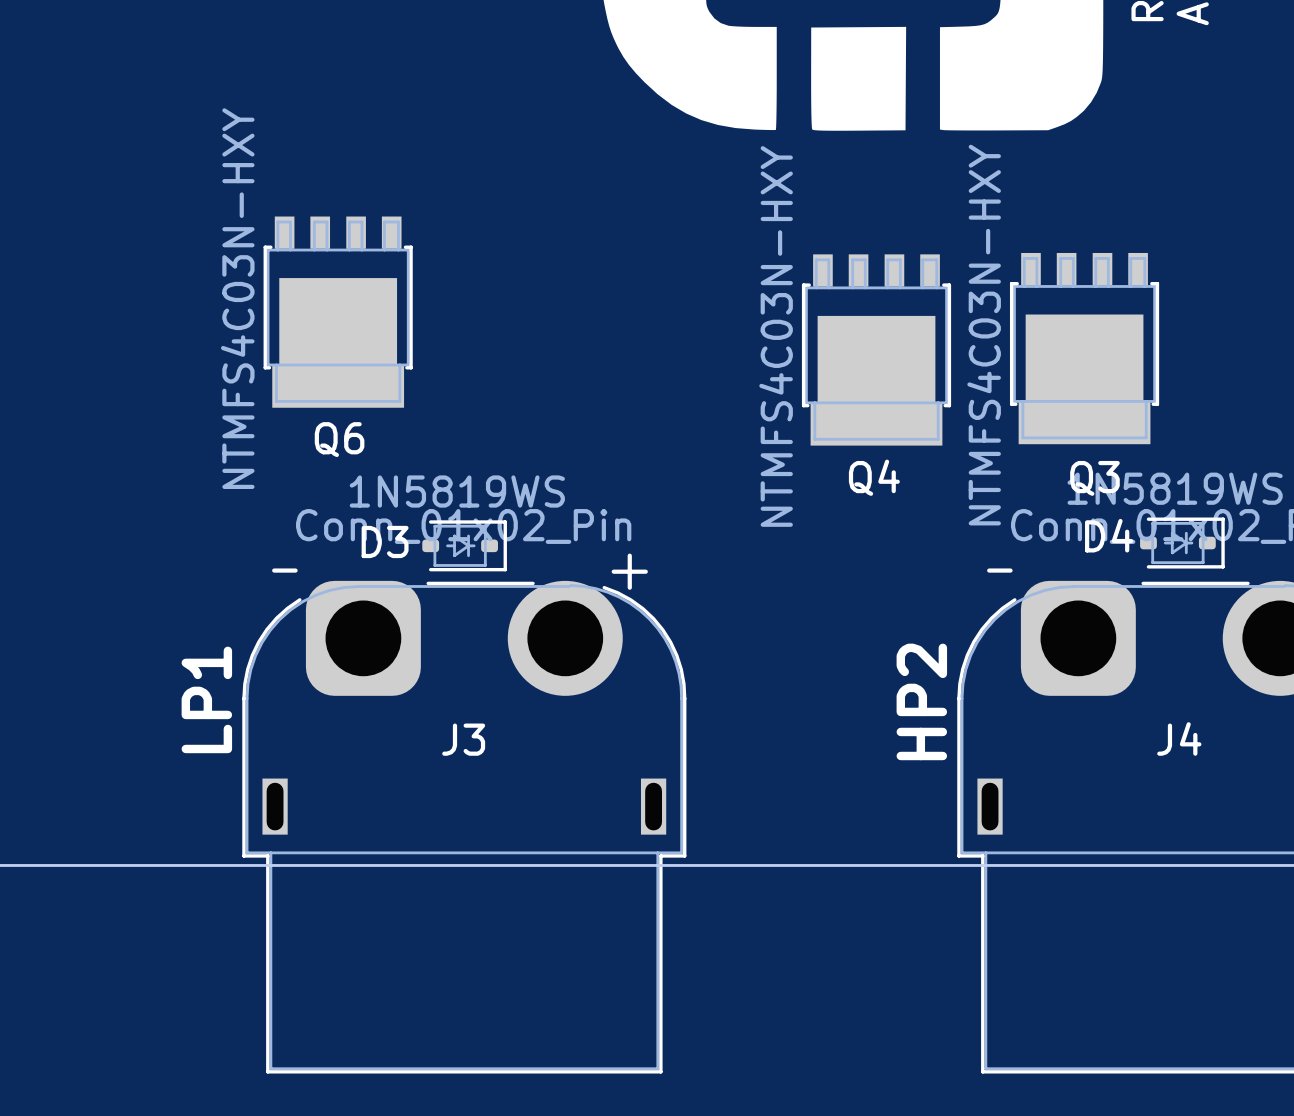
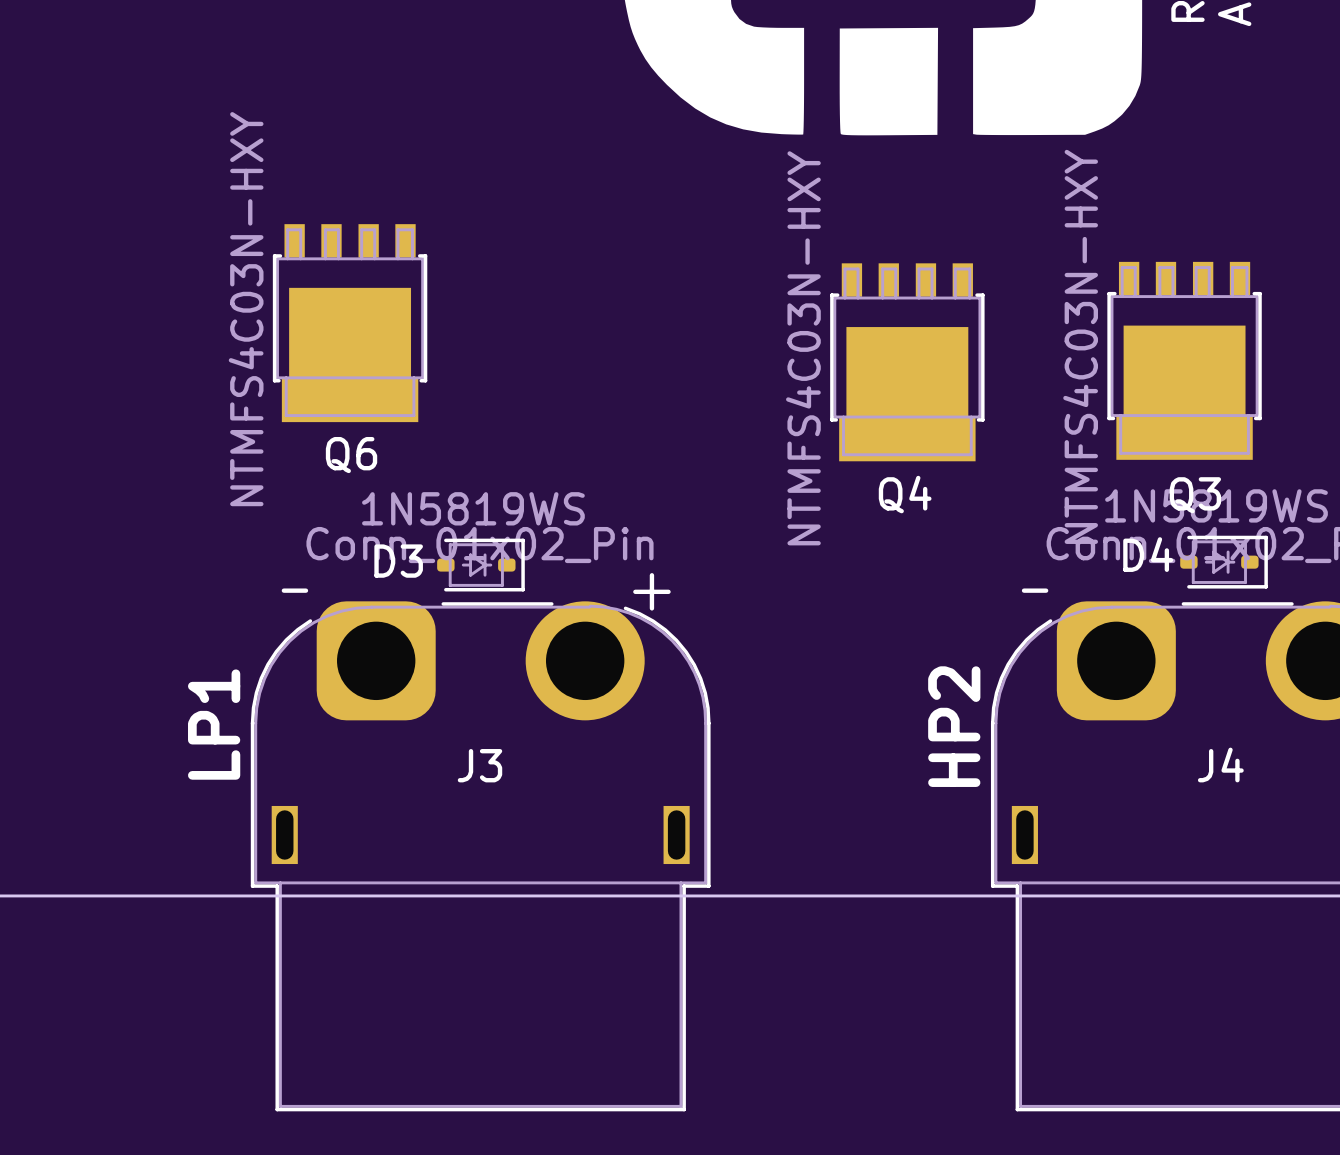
Q3 position: (1084, 348) -> (1184, 360)

